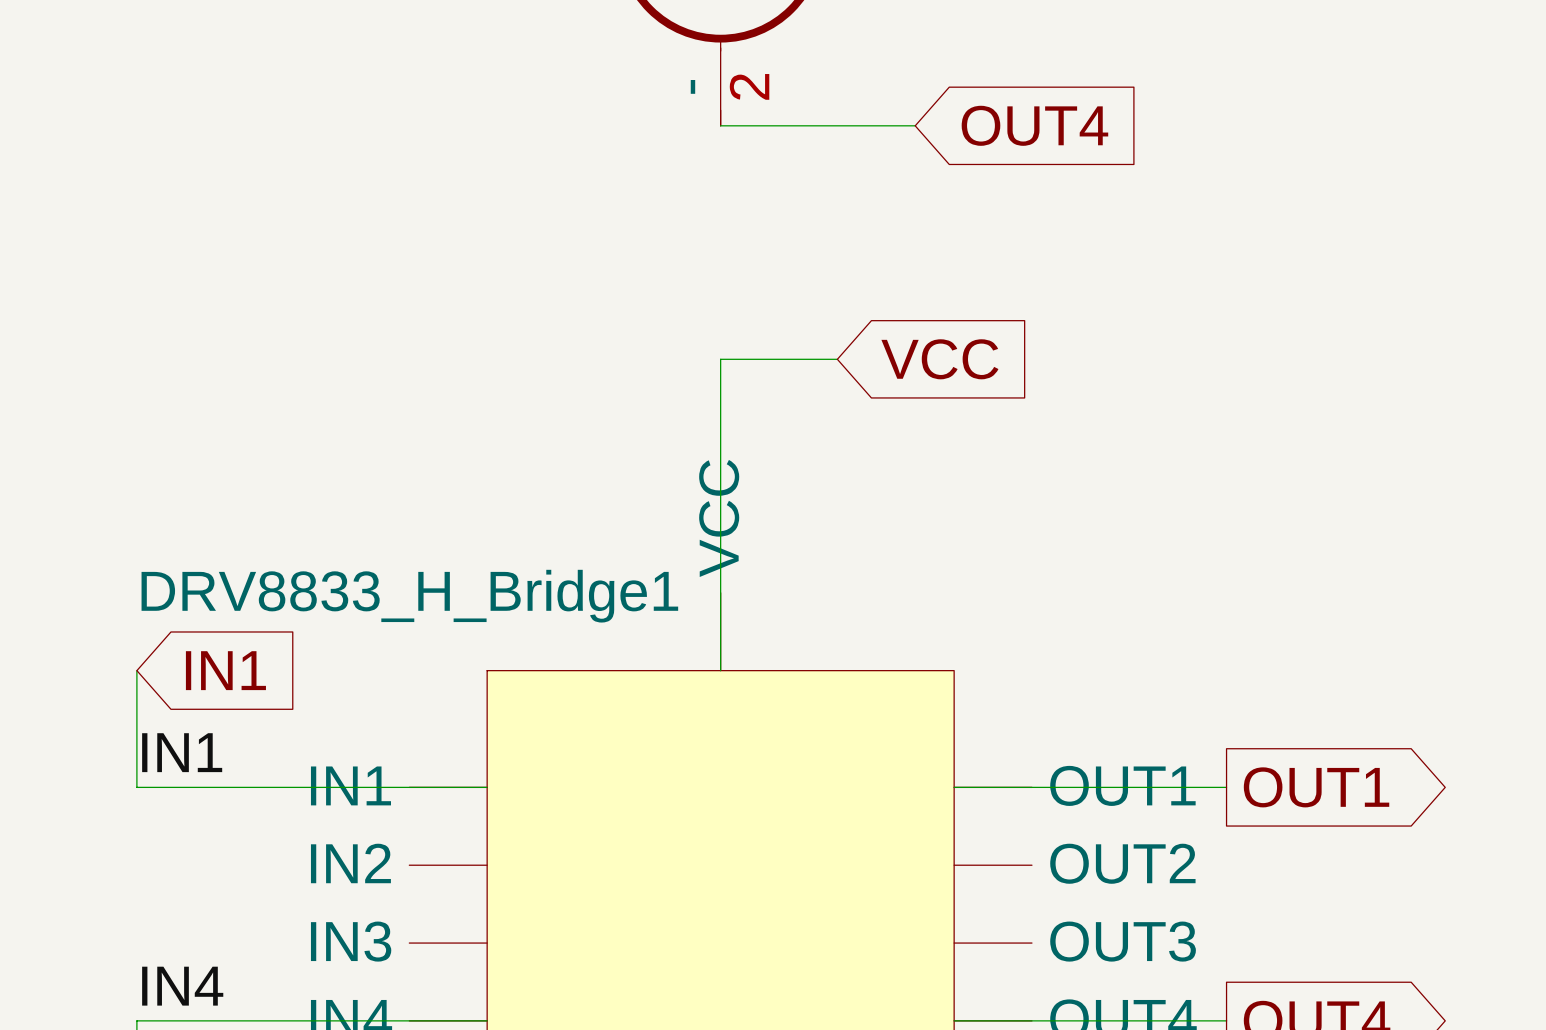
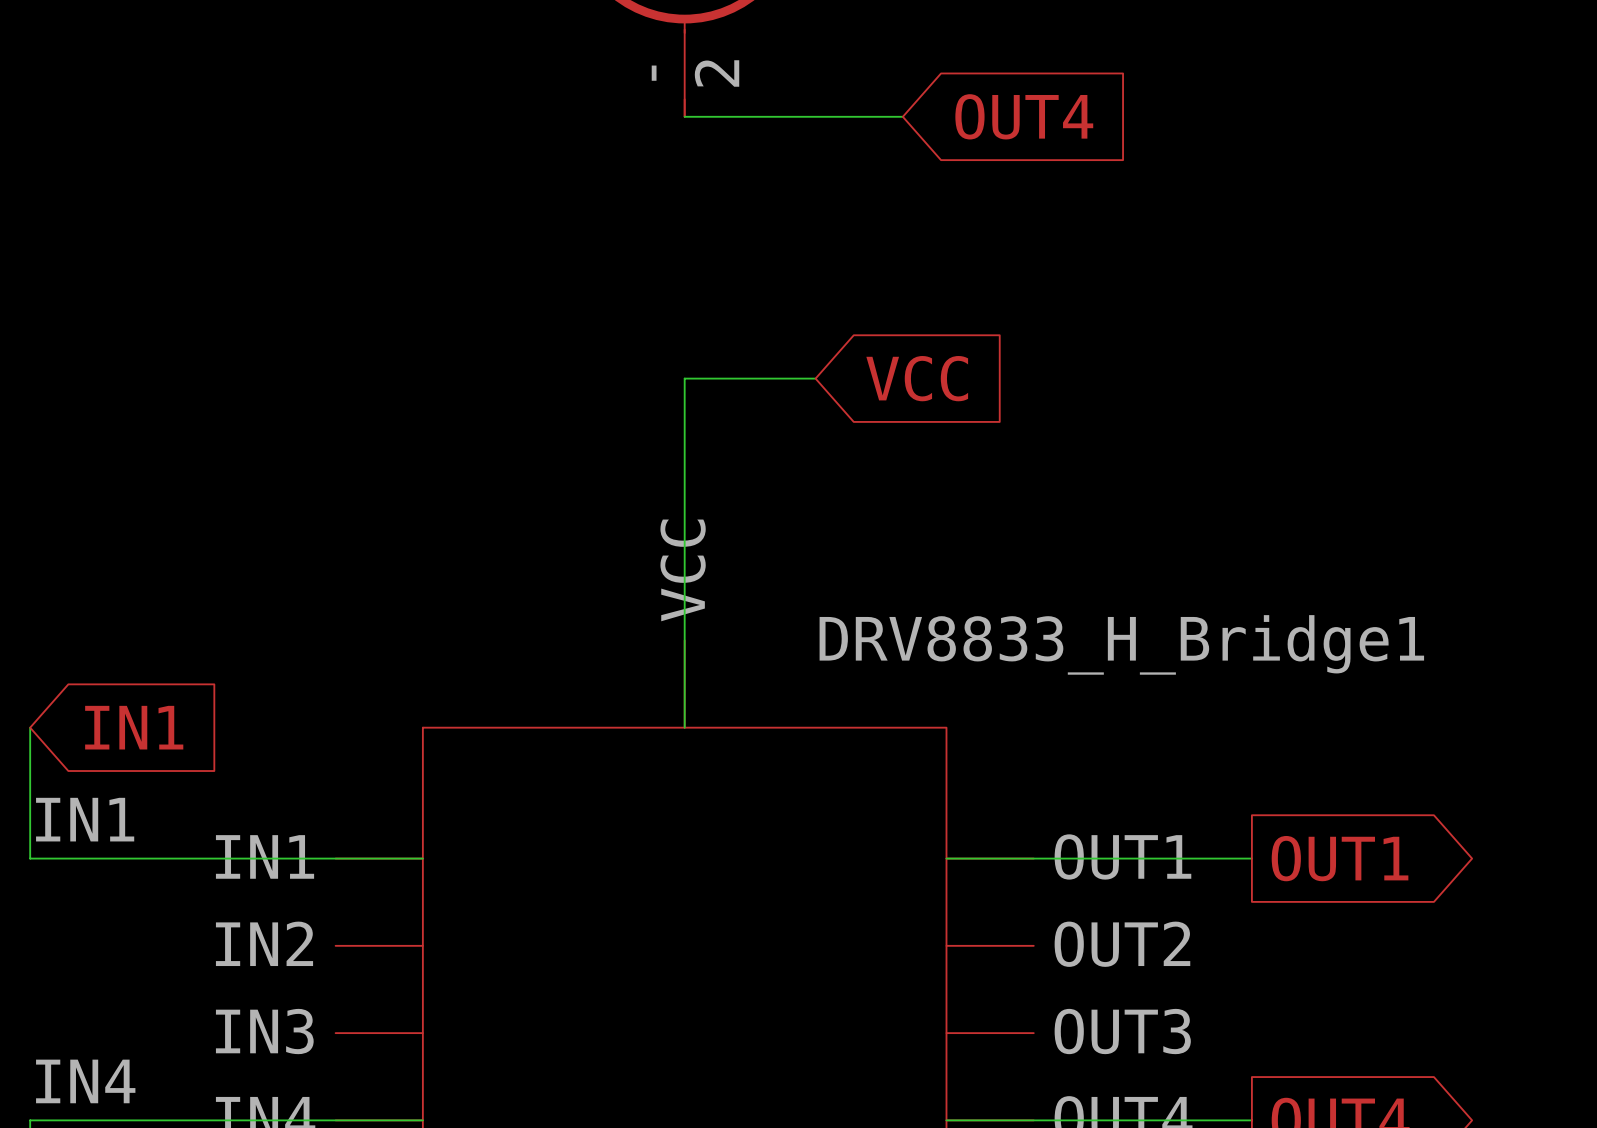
DRV8833_H_Bridge1 name position: DRV8833_H_Bridge1 (409, 596) -> DRV8833_H_Bridge1 (1121, 644)

